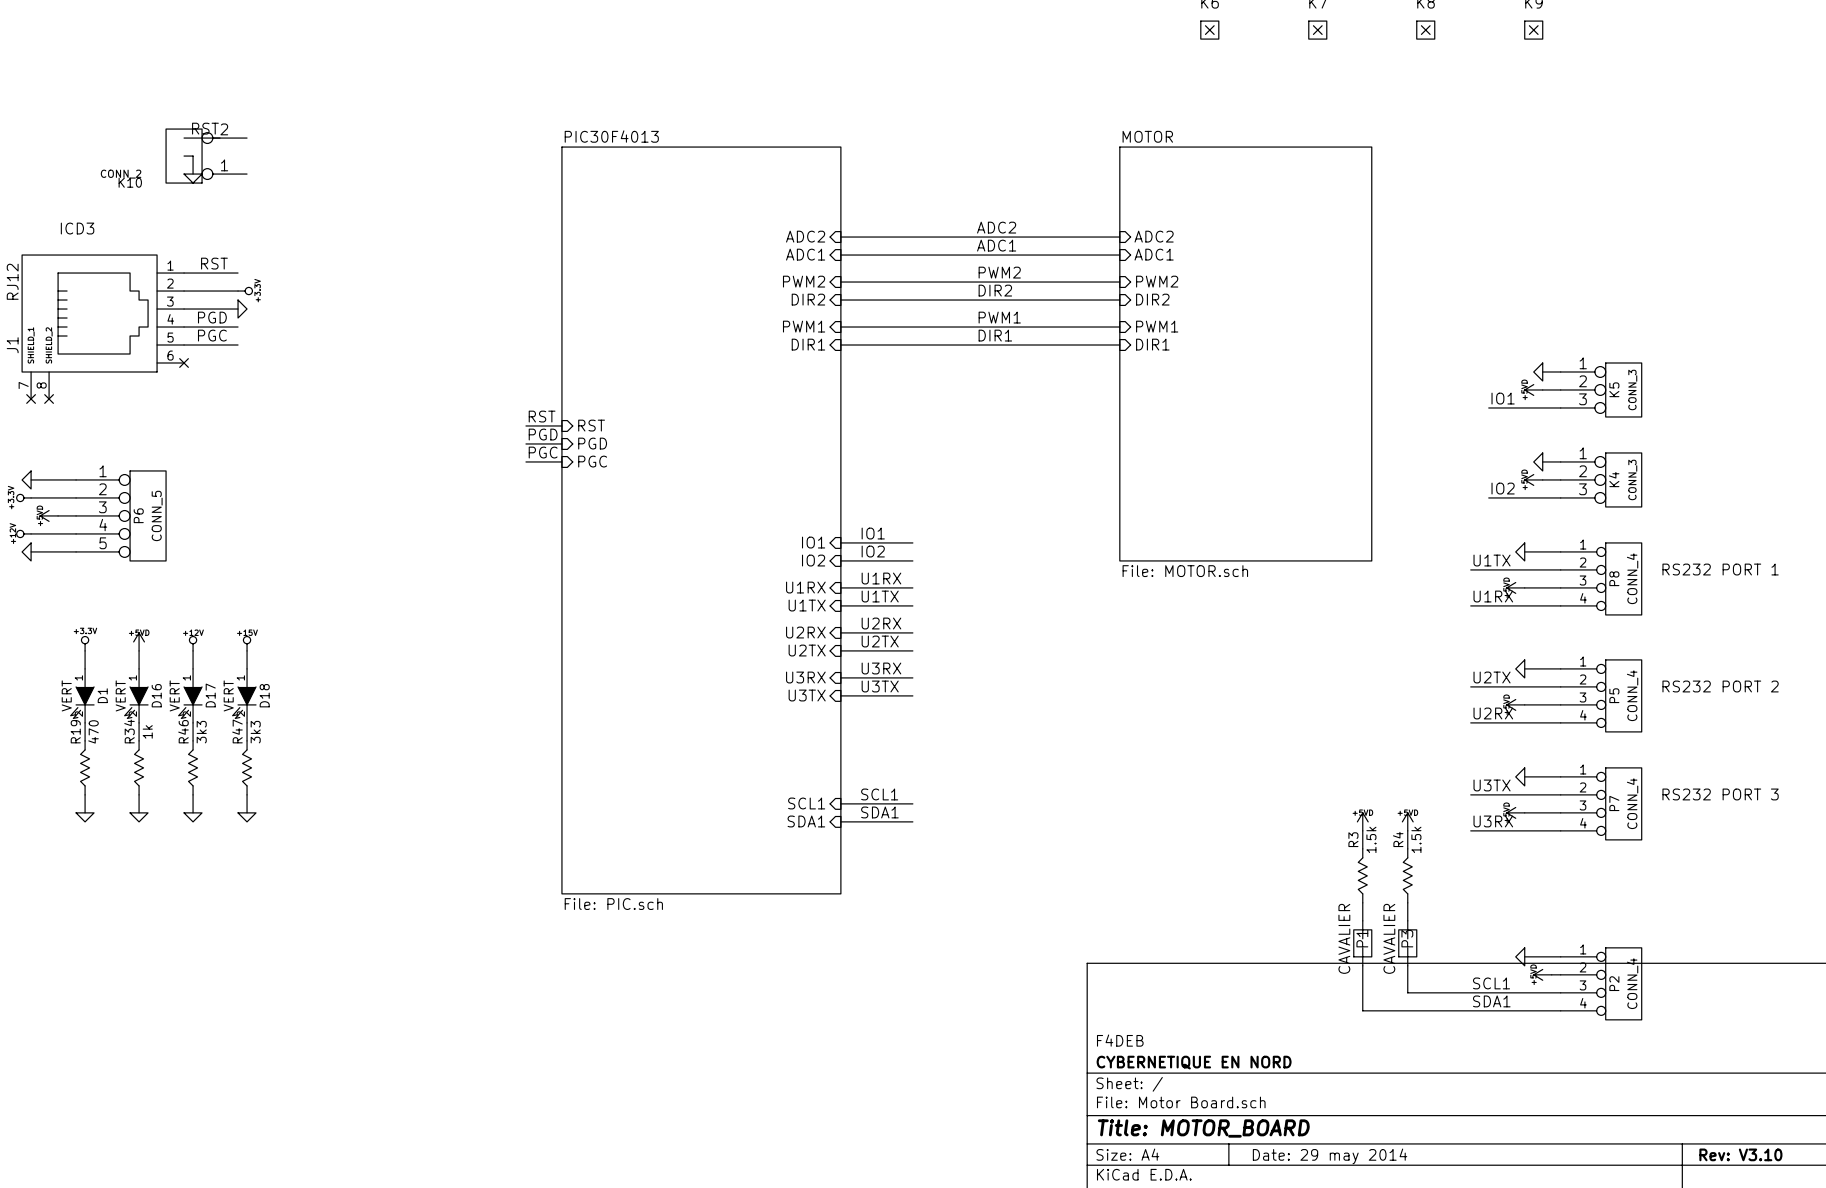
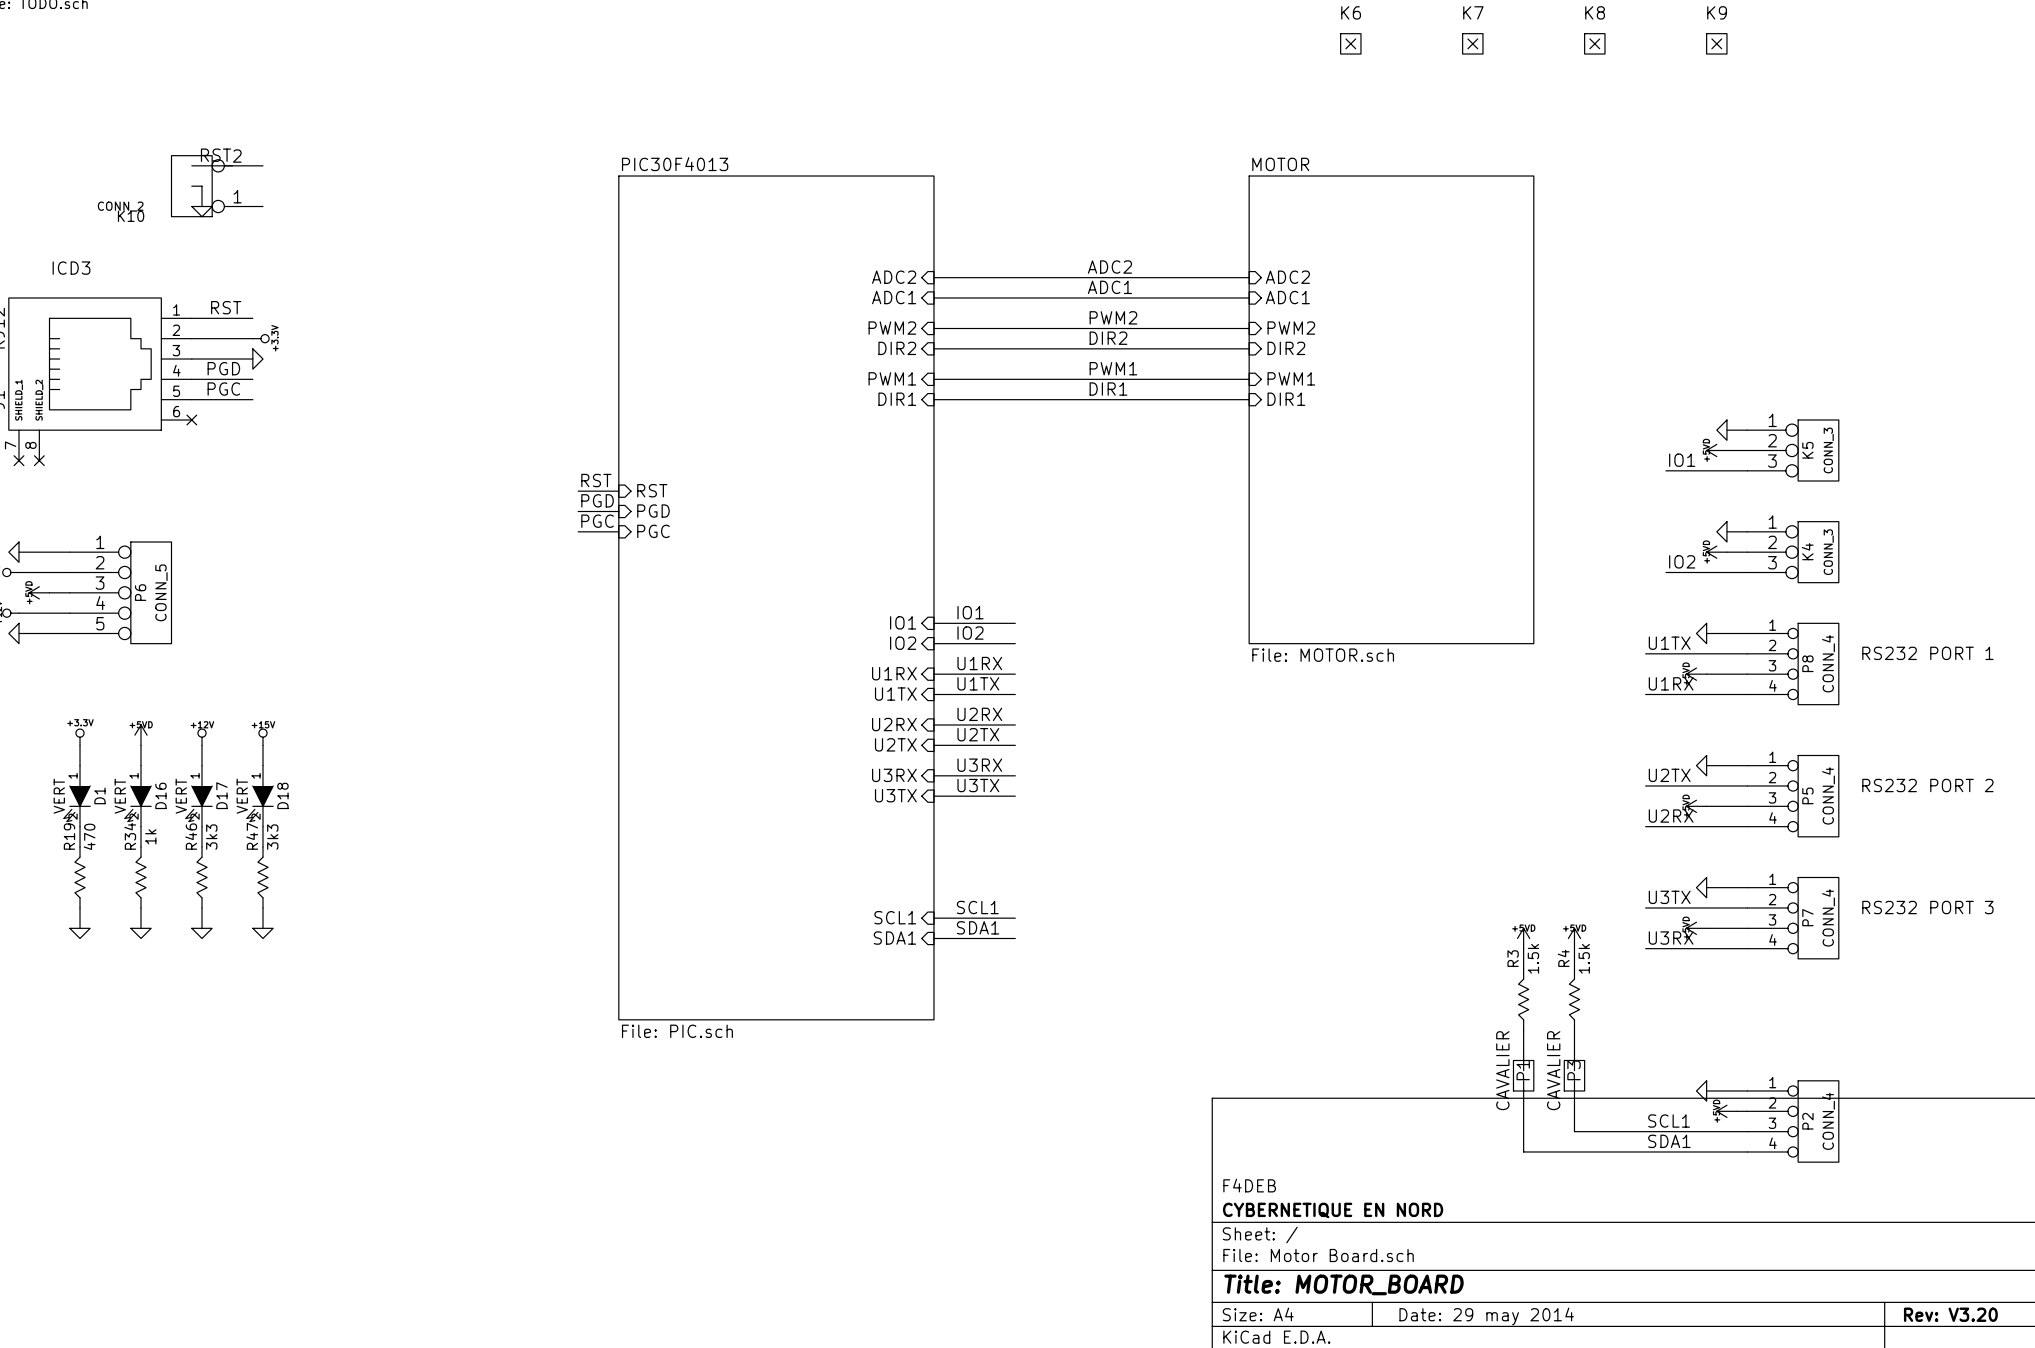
title block: Rev: V3.10 (1740, 1154) -> Rev: V3.20 (1950, 1314)

